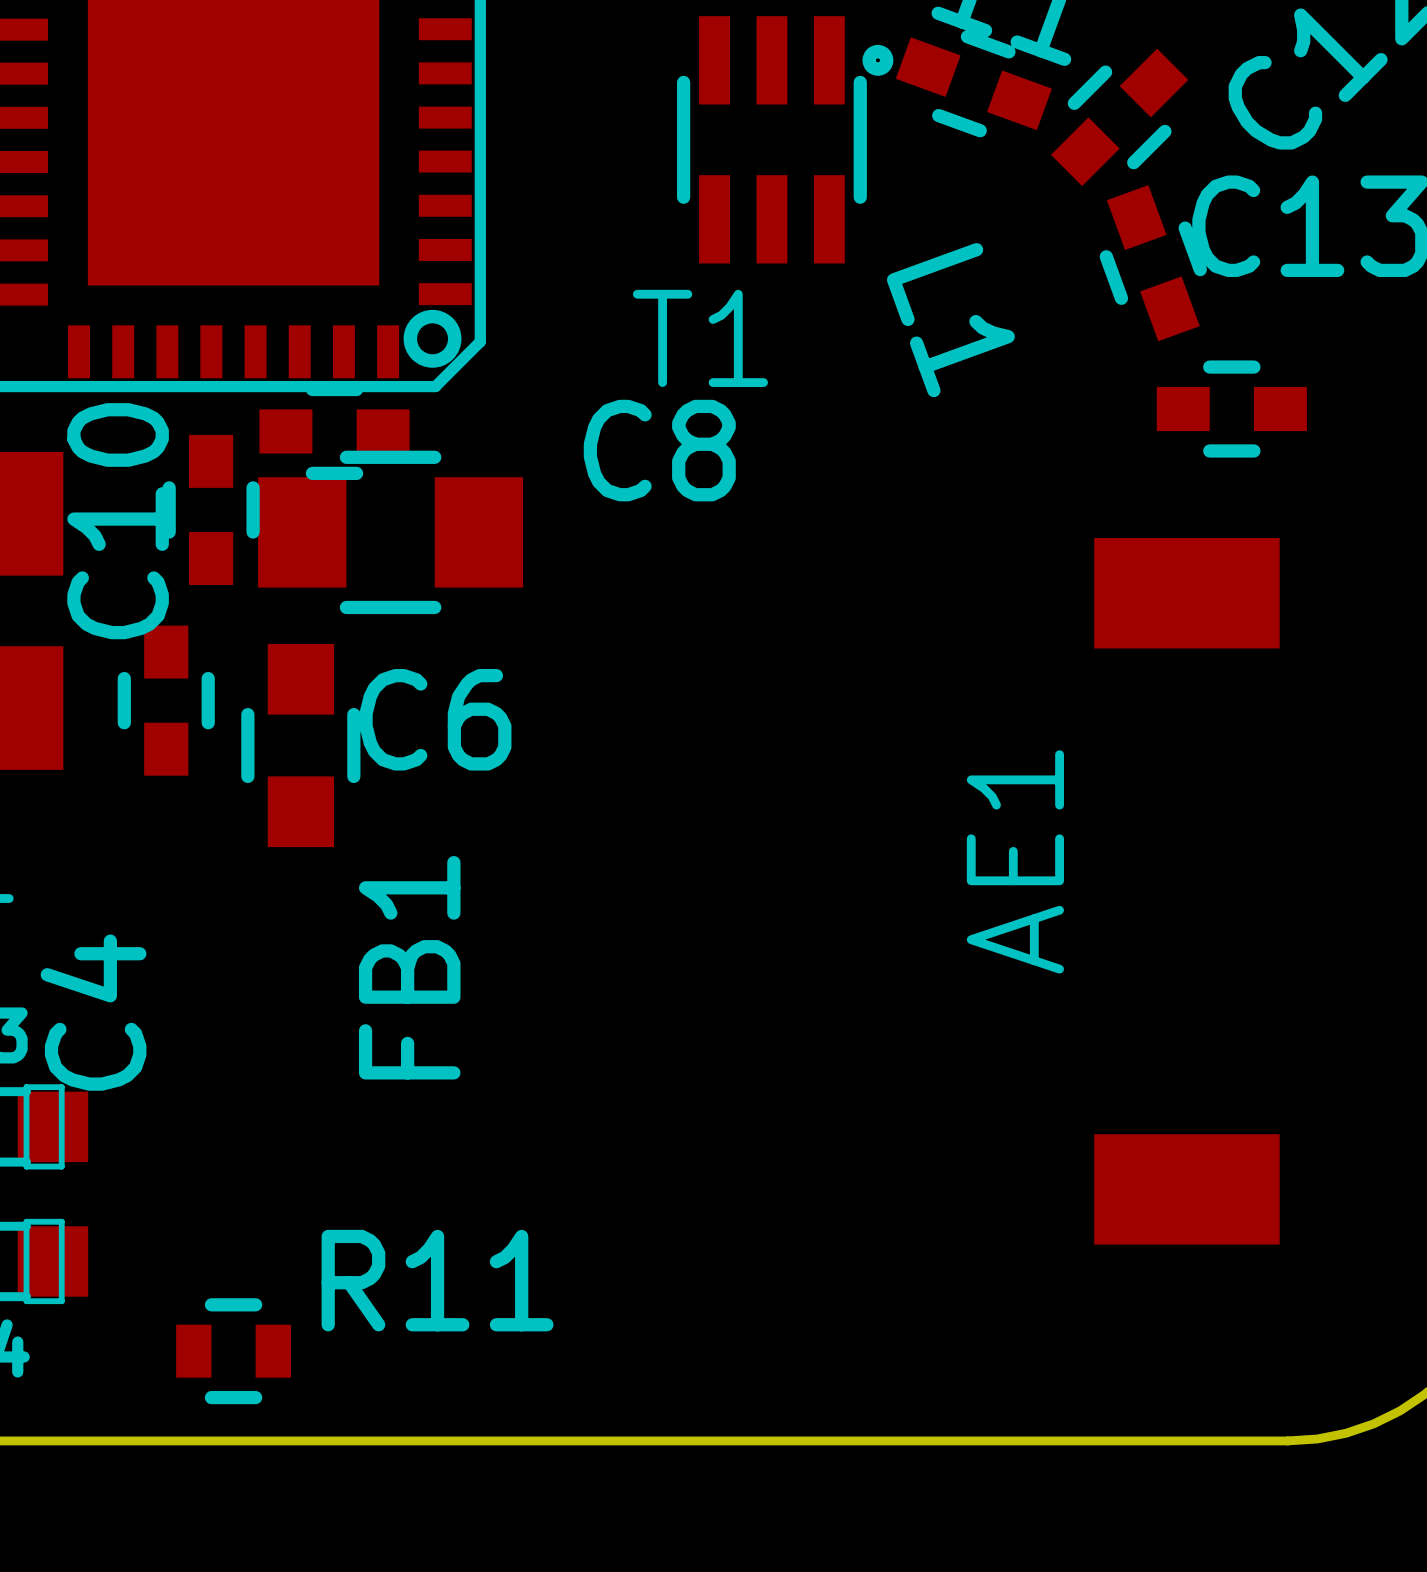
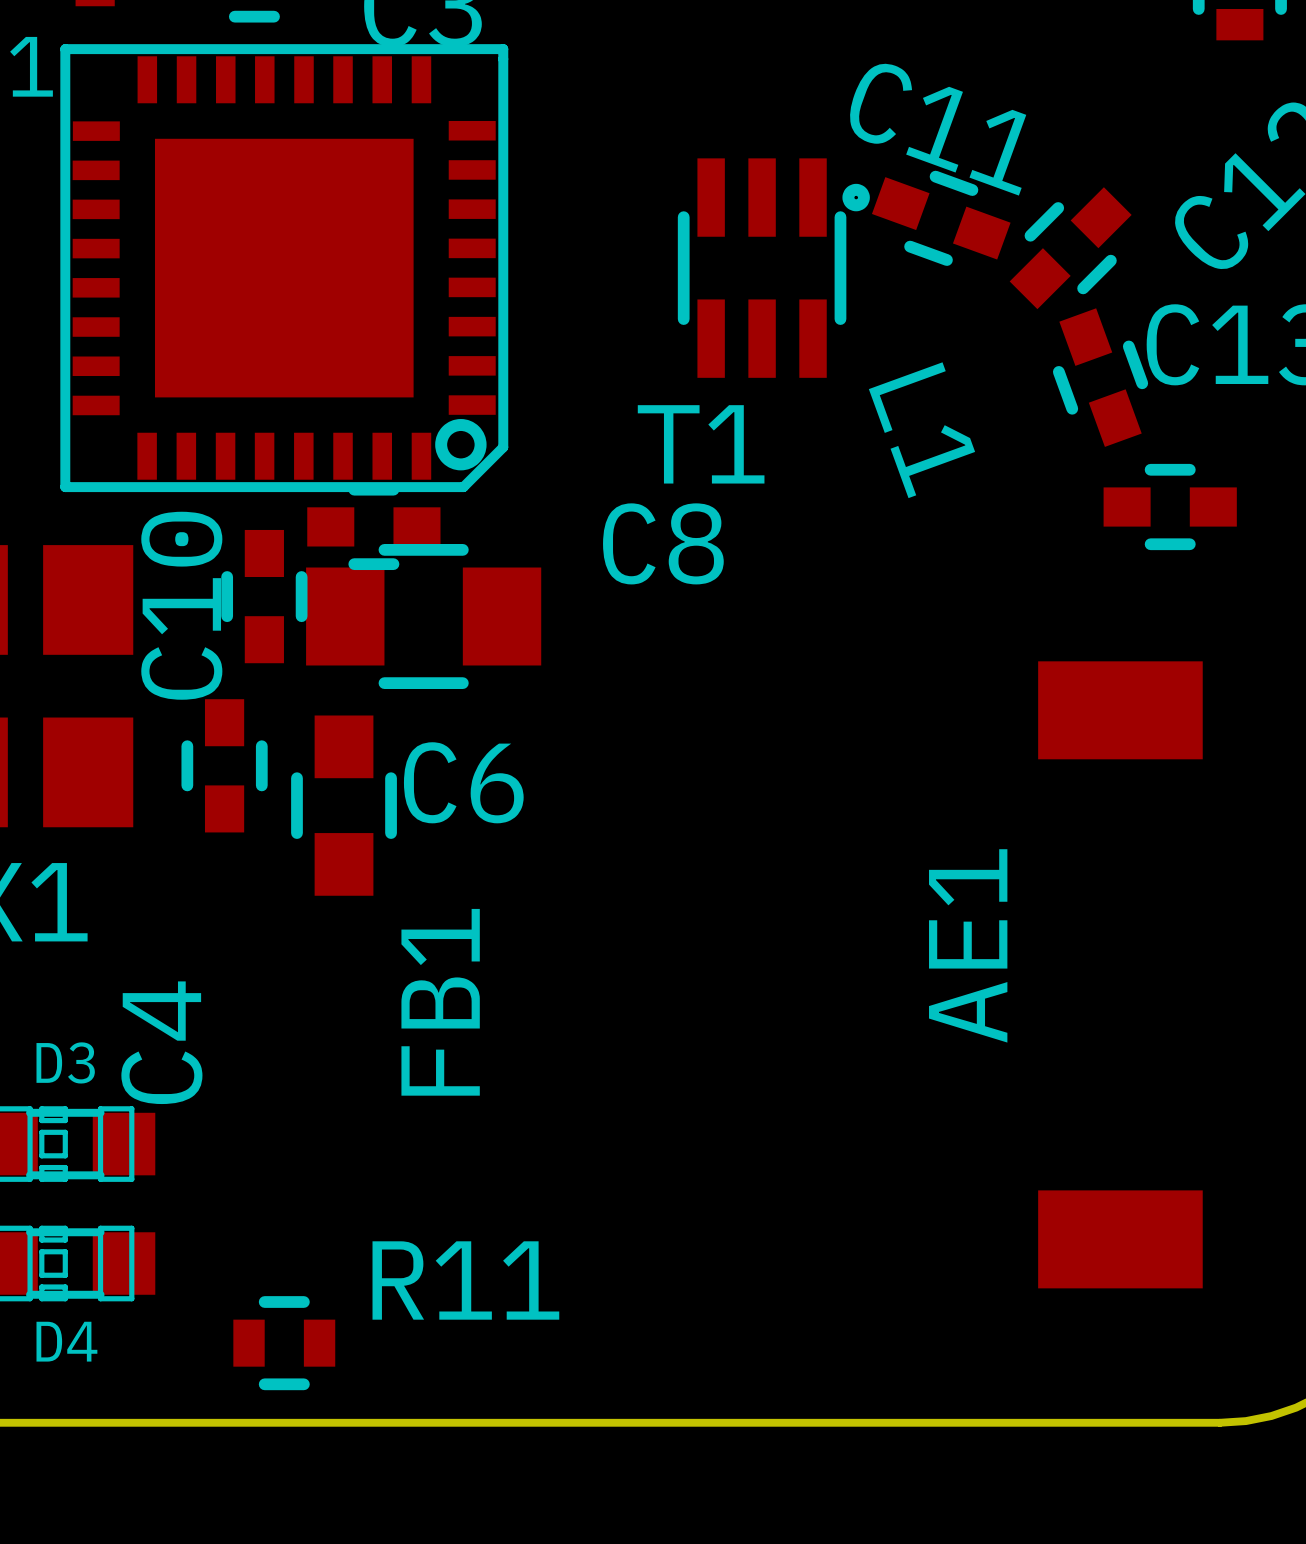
AE1 position: (1186, 891) -> (1120, 974)

